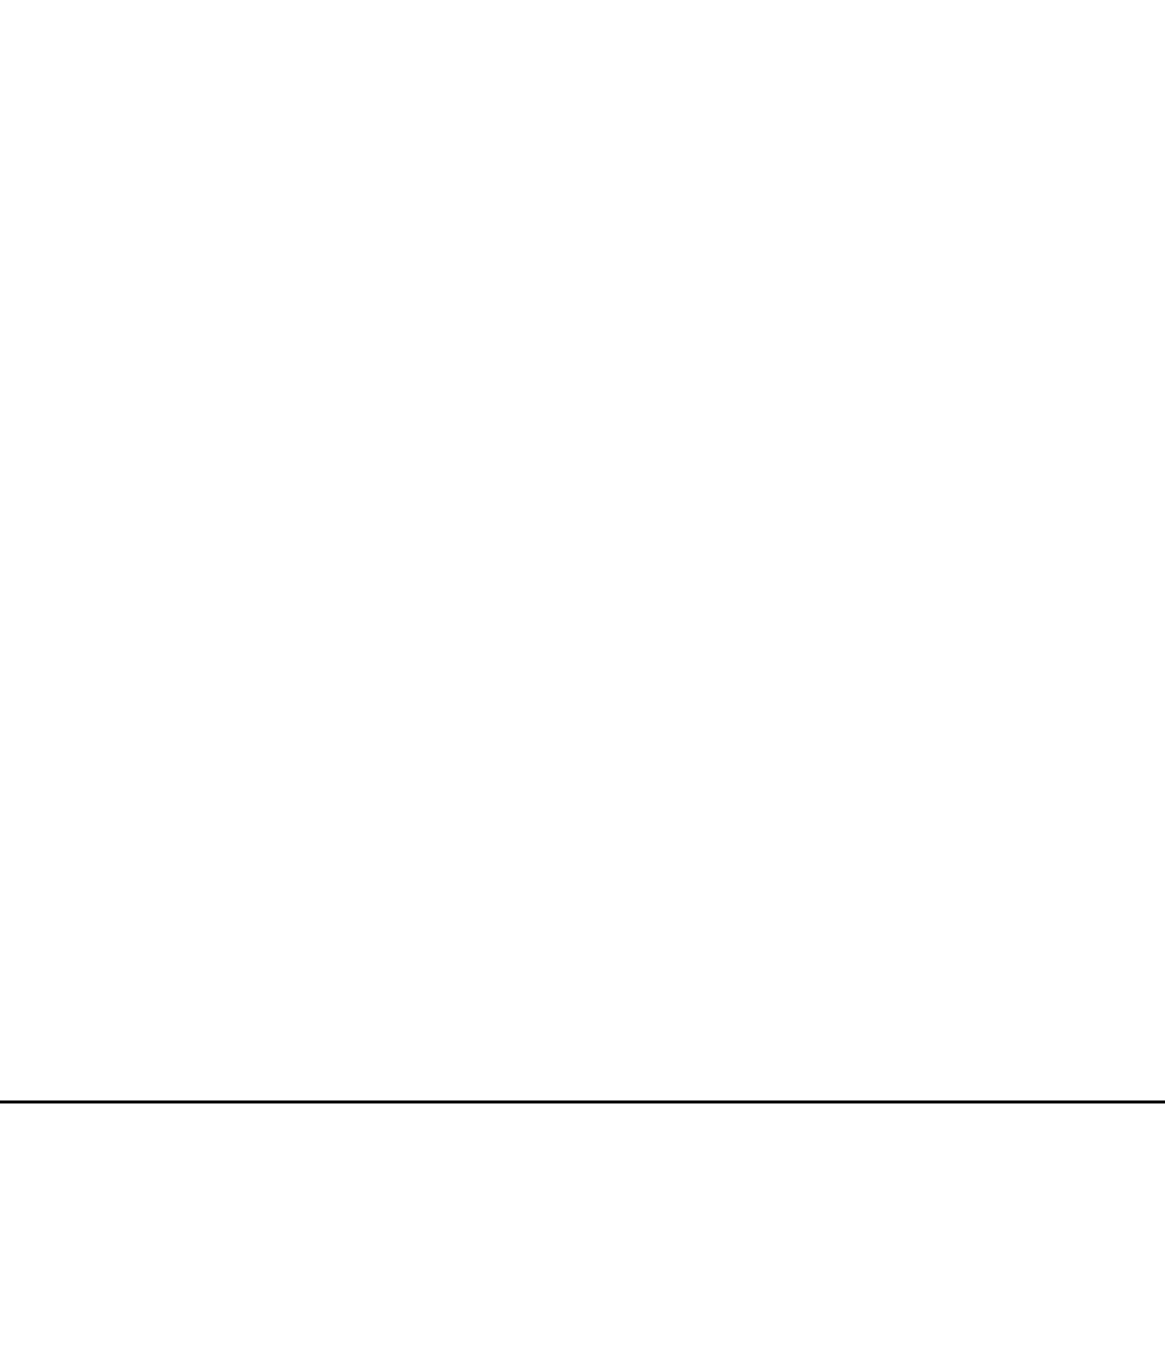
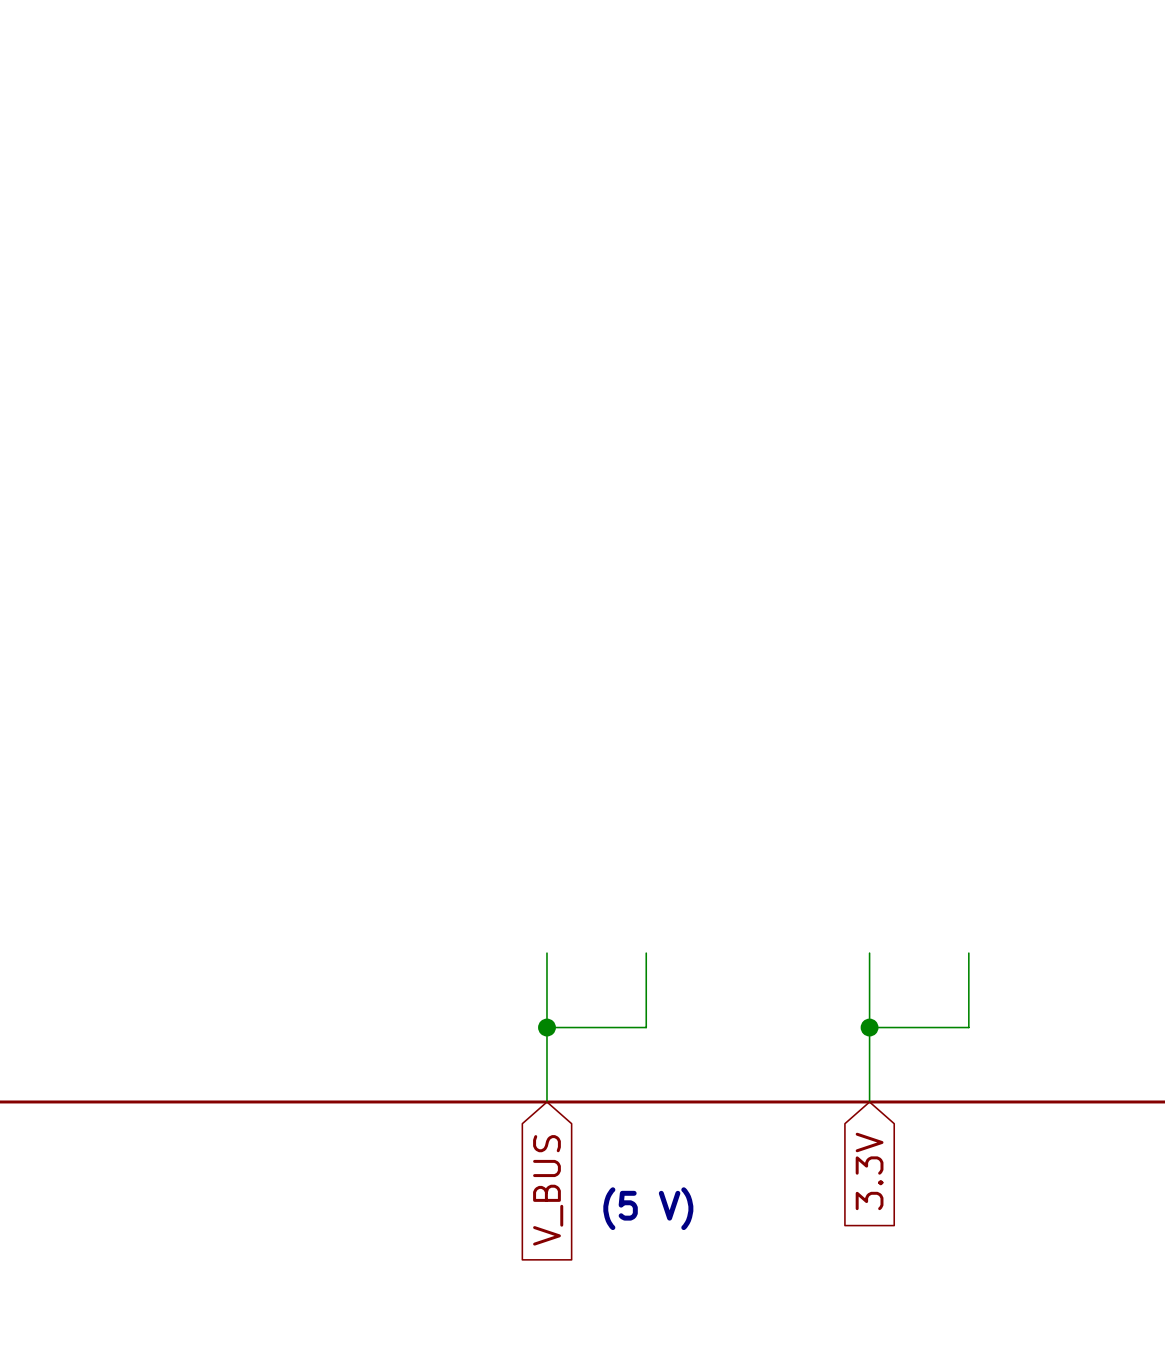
wire: none -> (546, 953) (546, 1101)
wire: none -> (646, 953) (646, 1027) (546, 1027)
wire: none -> (869, 953) (869, 1101)
wire: none -> (968, 953) (968, 1027) (869, 1027)
junction: none -> (546, 1027)
junction: none -> (869, 1027)
global label: none -> 3.3V (869, 1171)
global label: none -> V_BUS (548, 1190)
text: none -> (5 V) (648, 1208)

